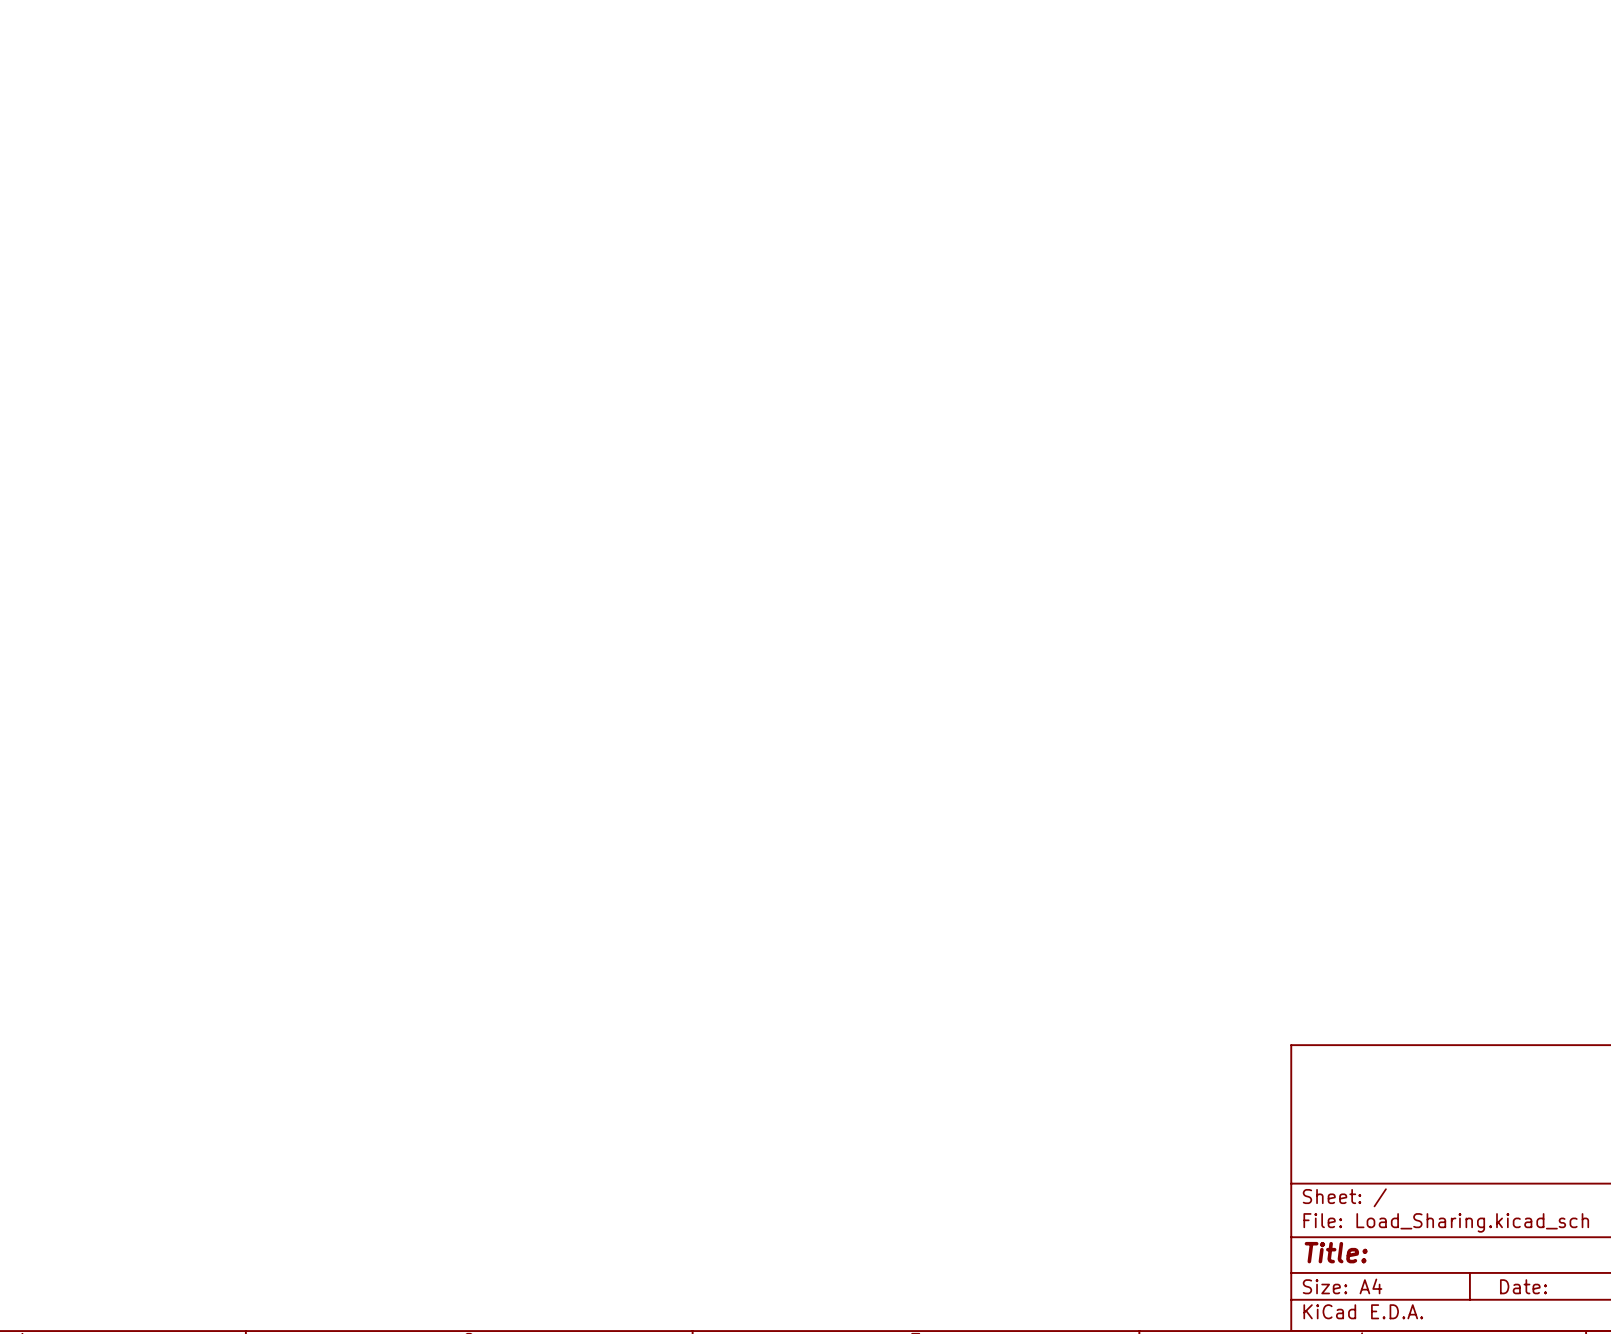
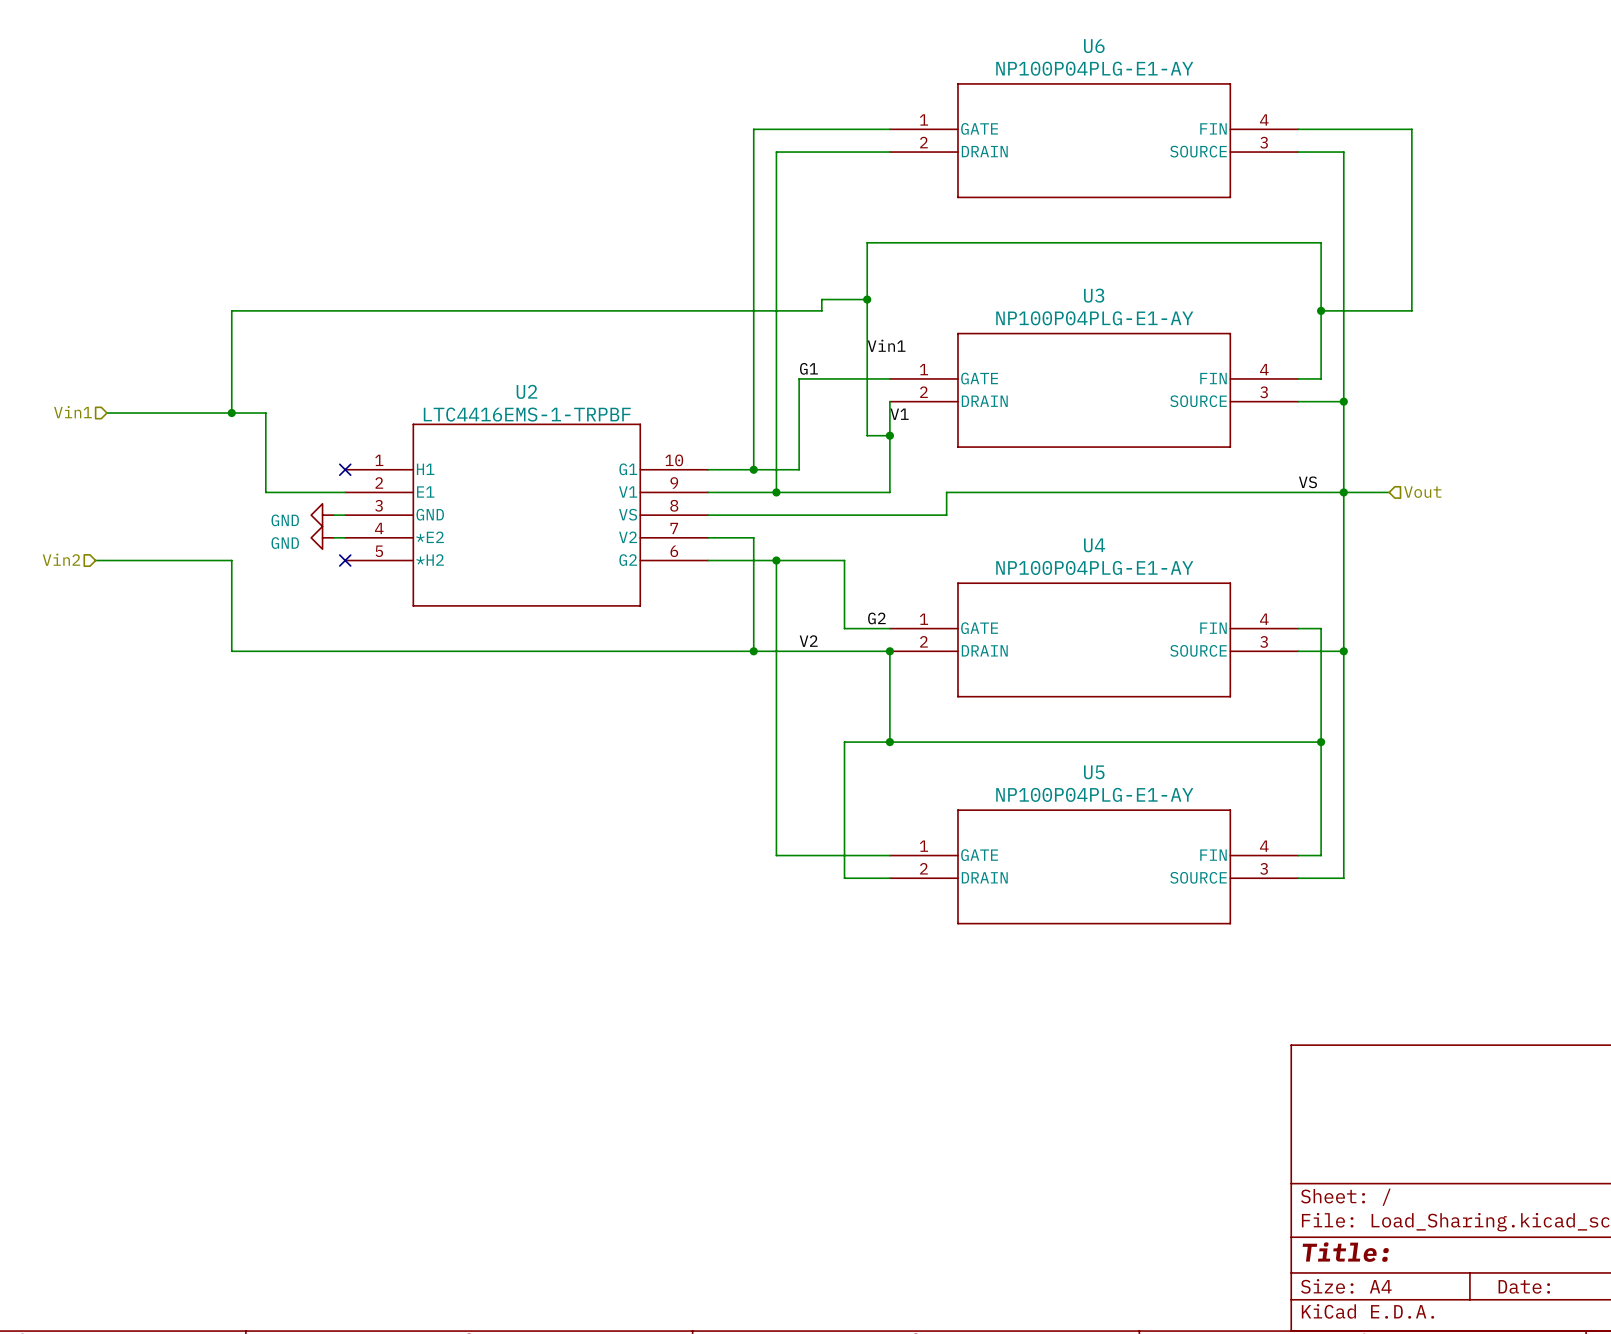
wire: none -> (889, 129) (753, 129) (753, 469)
wire: none -> (1298, 129) (1411, 129) (1411, 310) (1321, 310)
U6: none -> NP100P04PLG-E1-AY (1094, 140)
wire: none -> (889, 152) (776, 152) (776, 492)
wire: none -> (1298, 152) (1343, 152) (1343, 878) (1298, 878)
wire: none -> (867, 299) (821, 299) (821, 310) (231, 310) (231, 413)
junction: none -> (867, 299)
junction: none -> (1321, 310)
label: none -> Vin1 (886, 345)
label: none -> G1 (808, 368)
wire: none -> (889, 378) (799, 378) (799, 469) (708, 469)
wire: none -> (1298, 378) (1321, 378) (1321, 242) (867, 242) (867, 435) (889, 435)
U3: none -> NP100P04PLG-E1-AY (1094, 390)
wire: none -> (889, 401) (889, 492) (708, 492)
wire: none -> (1298, 401) (1343, 401)
junction: none -> (1343, 401)
hierarchical label: none -> Vin1 (72, 412)
wire: none -> (106, 413) (265, 413) (265, 492) (345, 492)
junction: none -> (231, 413)
label: none -> V1 (899, 414)
junction: none -> (889, 435)
no-connect mark: none -> (345, 469)
junction: none -> (753, 469)
label: none -> VS (1307, 482)
junction: none -> (776, 492)
junction: none -> (1343, 492)
wire: none -> (1389, 492) (946, 492) (946, 515) (708, 515)
hierarchical label: none -> Vout (1422, 492)
power symbol: none -> GND (322, 515)
wire: none -> (333, 515) (345, 515)
U2: none -> LTC4416EMS-1-TRPBF (526, 515)
power symbol: none -> GND (322, 537)
wire: none -> (333, 537) (345, 537)
wire: none -> (708, 537) (753, 537) (753, 651)
hierarchical label: none -> Vin2 (61, 559)
wire: none -> (95, 560) (231, 560) (231, 651) (889, 651) (889, 742)
no-connect mark: none -> (345, 560)
wire: none -> (708, 560) (844, 560) (844, 628) (889, 628)
wire: none -> (776, 560) (776, 855) (889, 855)
junction: none -> (776, 560)
label: none -> G2 (876, 618)
wire: none -> (1298, 628) (1321, 628) (1321, 855) (1298, 855)
U4: none -> NP100P04PLG-E1-AY (1094, 639)
label: none -> V2 (808, 641)
junction: none -> (753, 651)
junction: none -> (889, 651)
wire: none -> (1298, 651) (1343, 651)
junction: none -> (1343, 651)
junction: none -> (889, 742)
wire: none -> (1321, 742) (844, 742) (844, 878) (889, 878)
junction: none -> (1321, 742)
U5: none -> NP100P04PLG-E1-AY (1094, 866)

